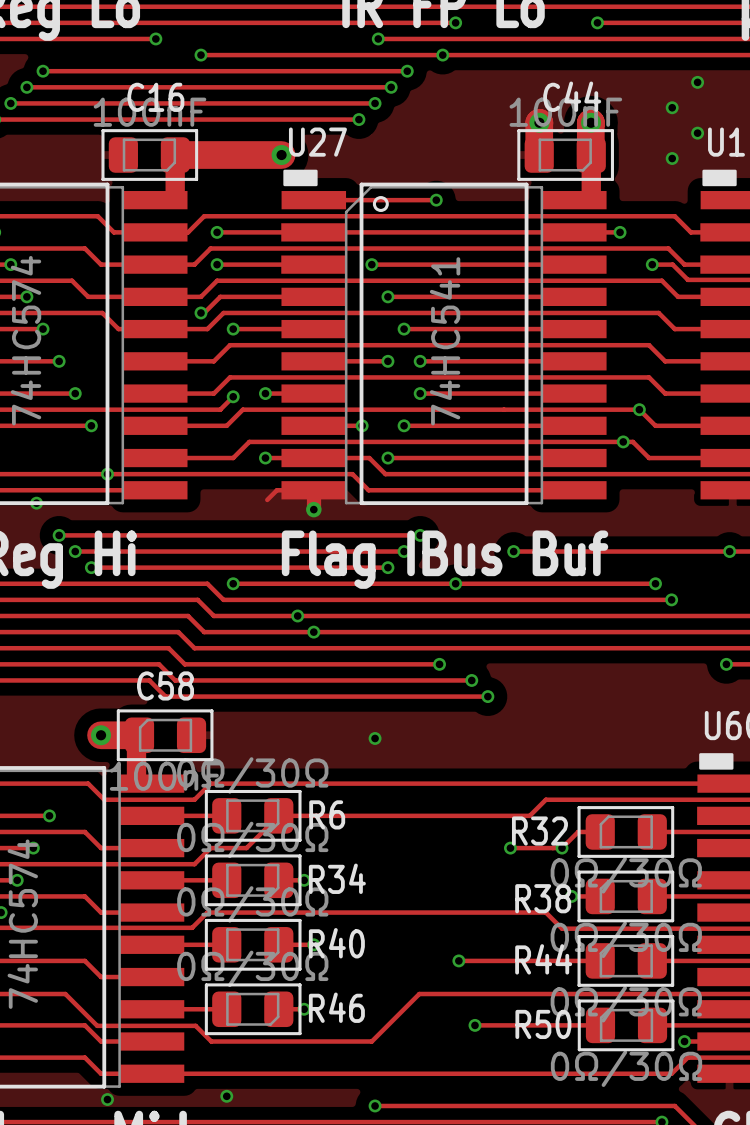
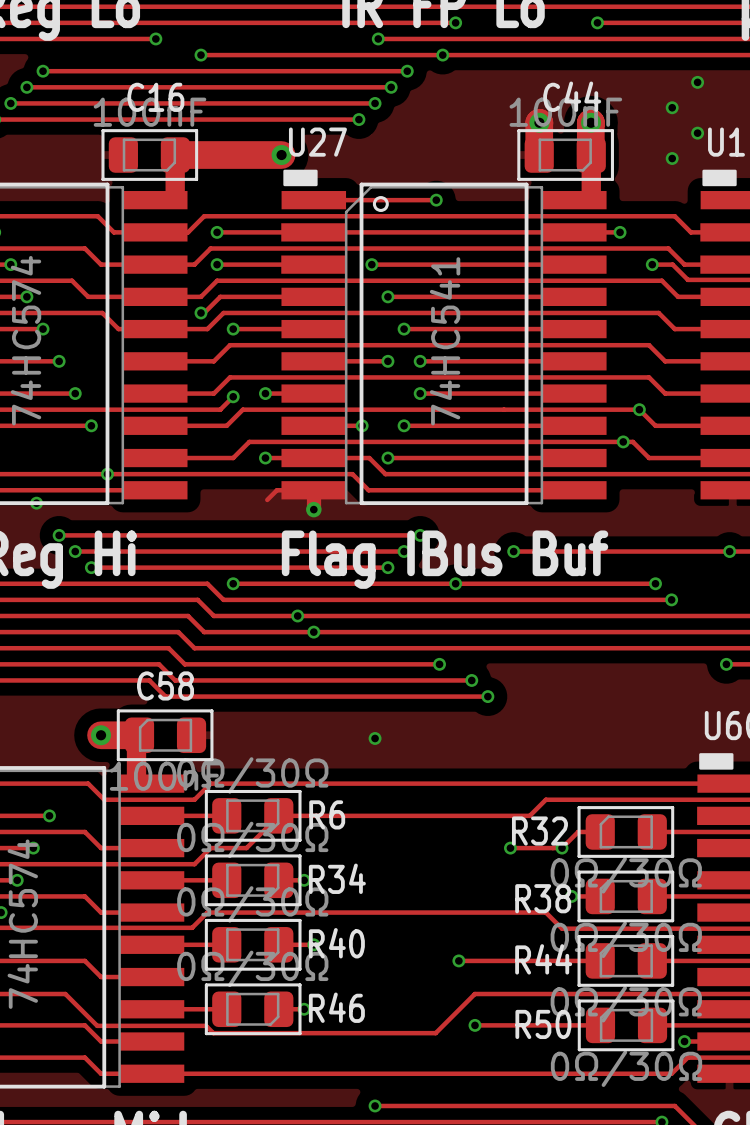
track: (474, 994) (419, 994) (371, 1041) (211, 1041) (195, 1025) -> (474, 994) (435, 1033) (213, 1033) (206, 1025) (195, 1025)
via: (226, 1096) -> none
via: (107, 1099) -> none

